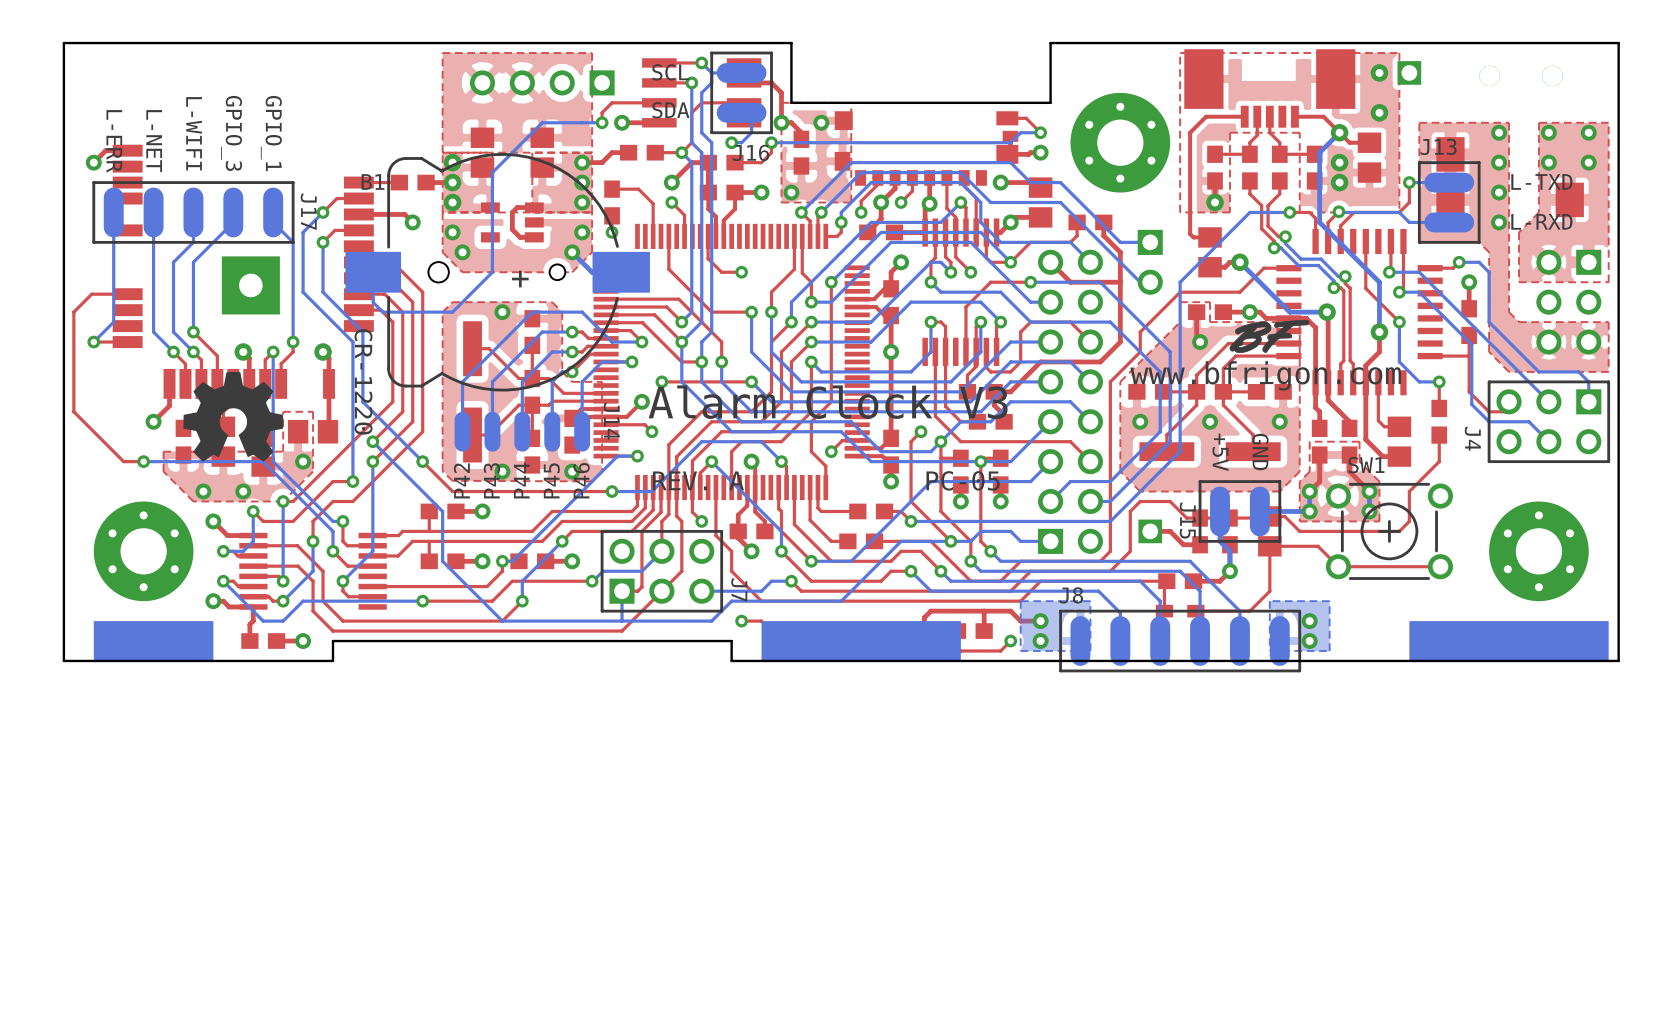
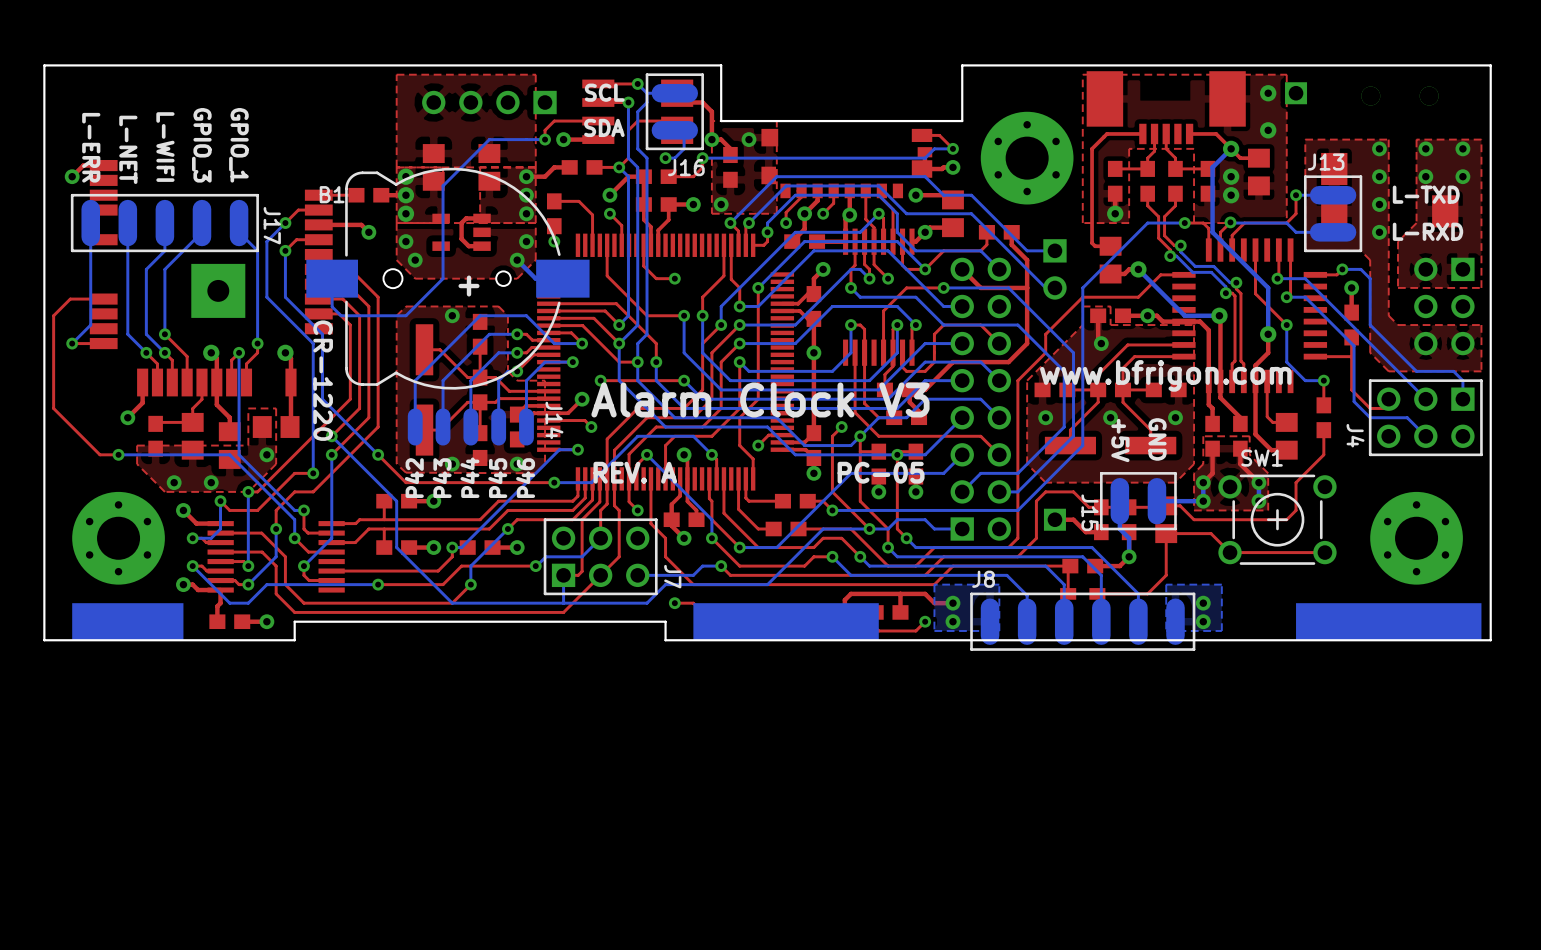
drawing: [1229, 320, 1310, 354] -> none
drawing: [183, 371, 284, 462] -> none

